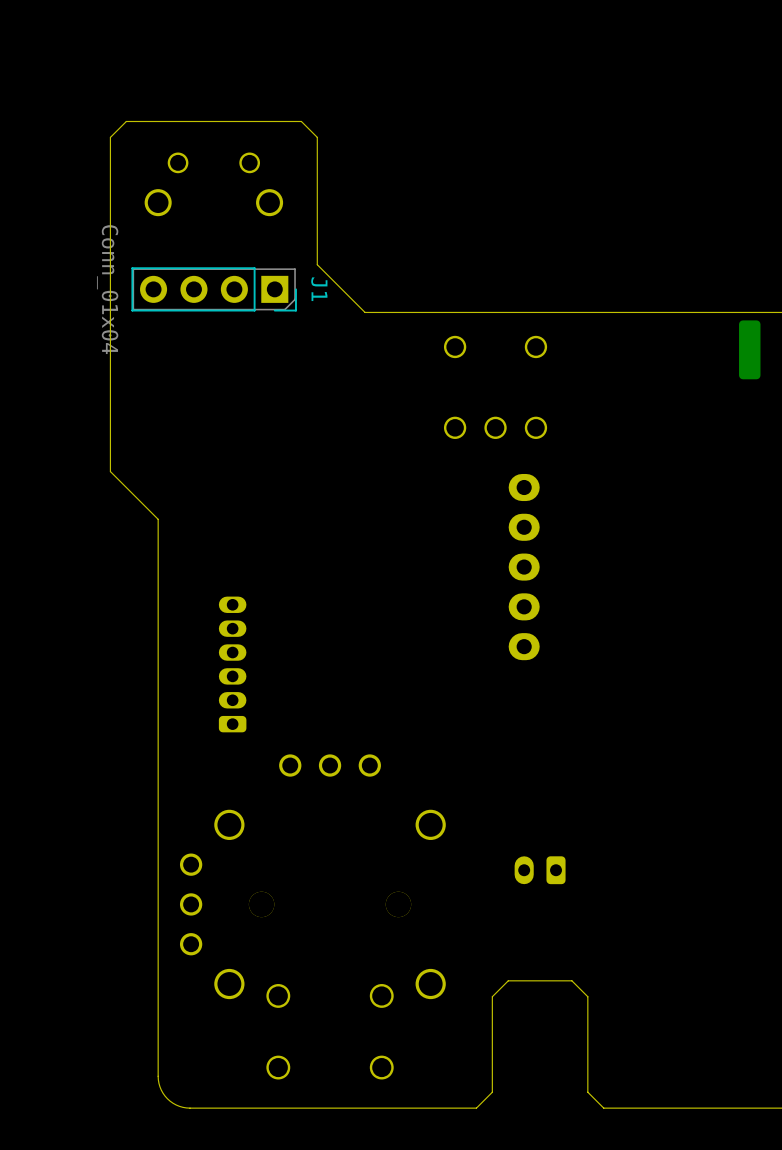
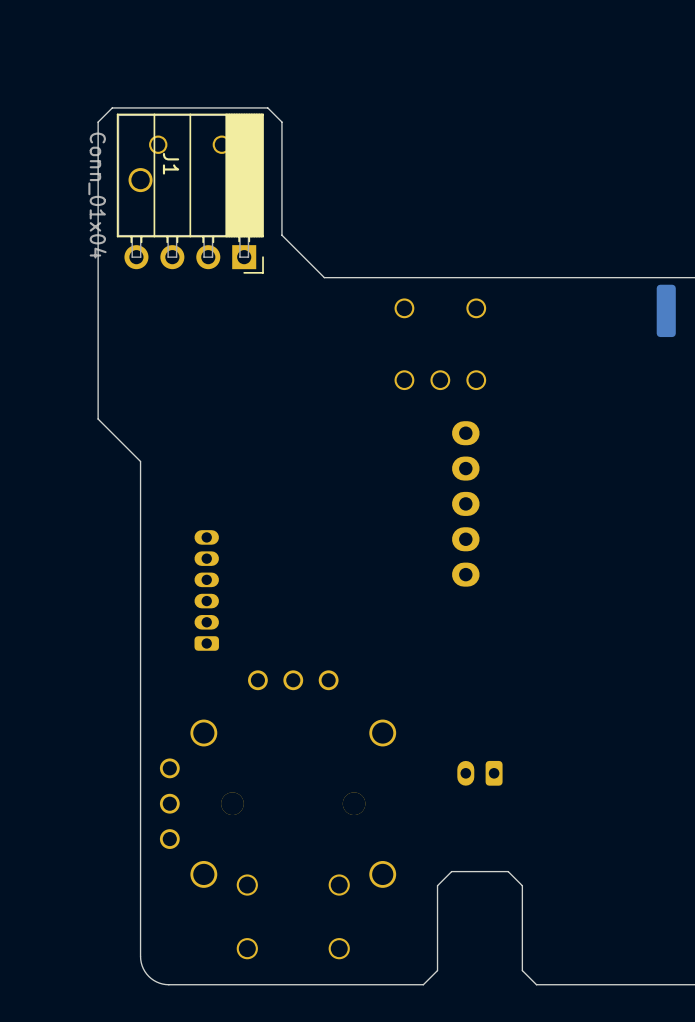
J1 footprint: [131, 267, 297, 312] -> [116, 113, 264, 274]
J1 name position: J1 (319, 289) -> J1 (171, 163)

